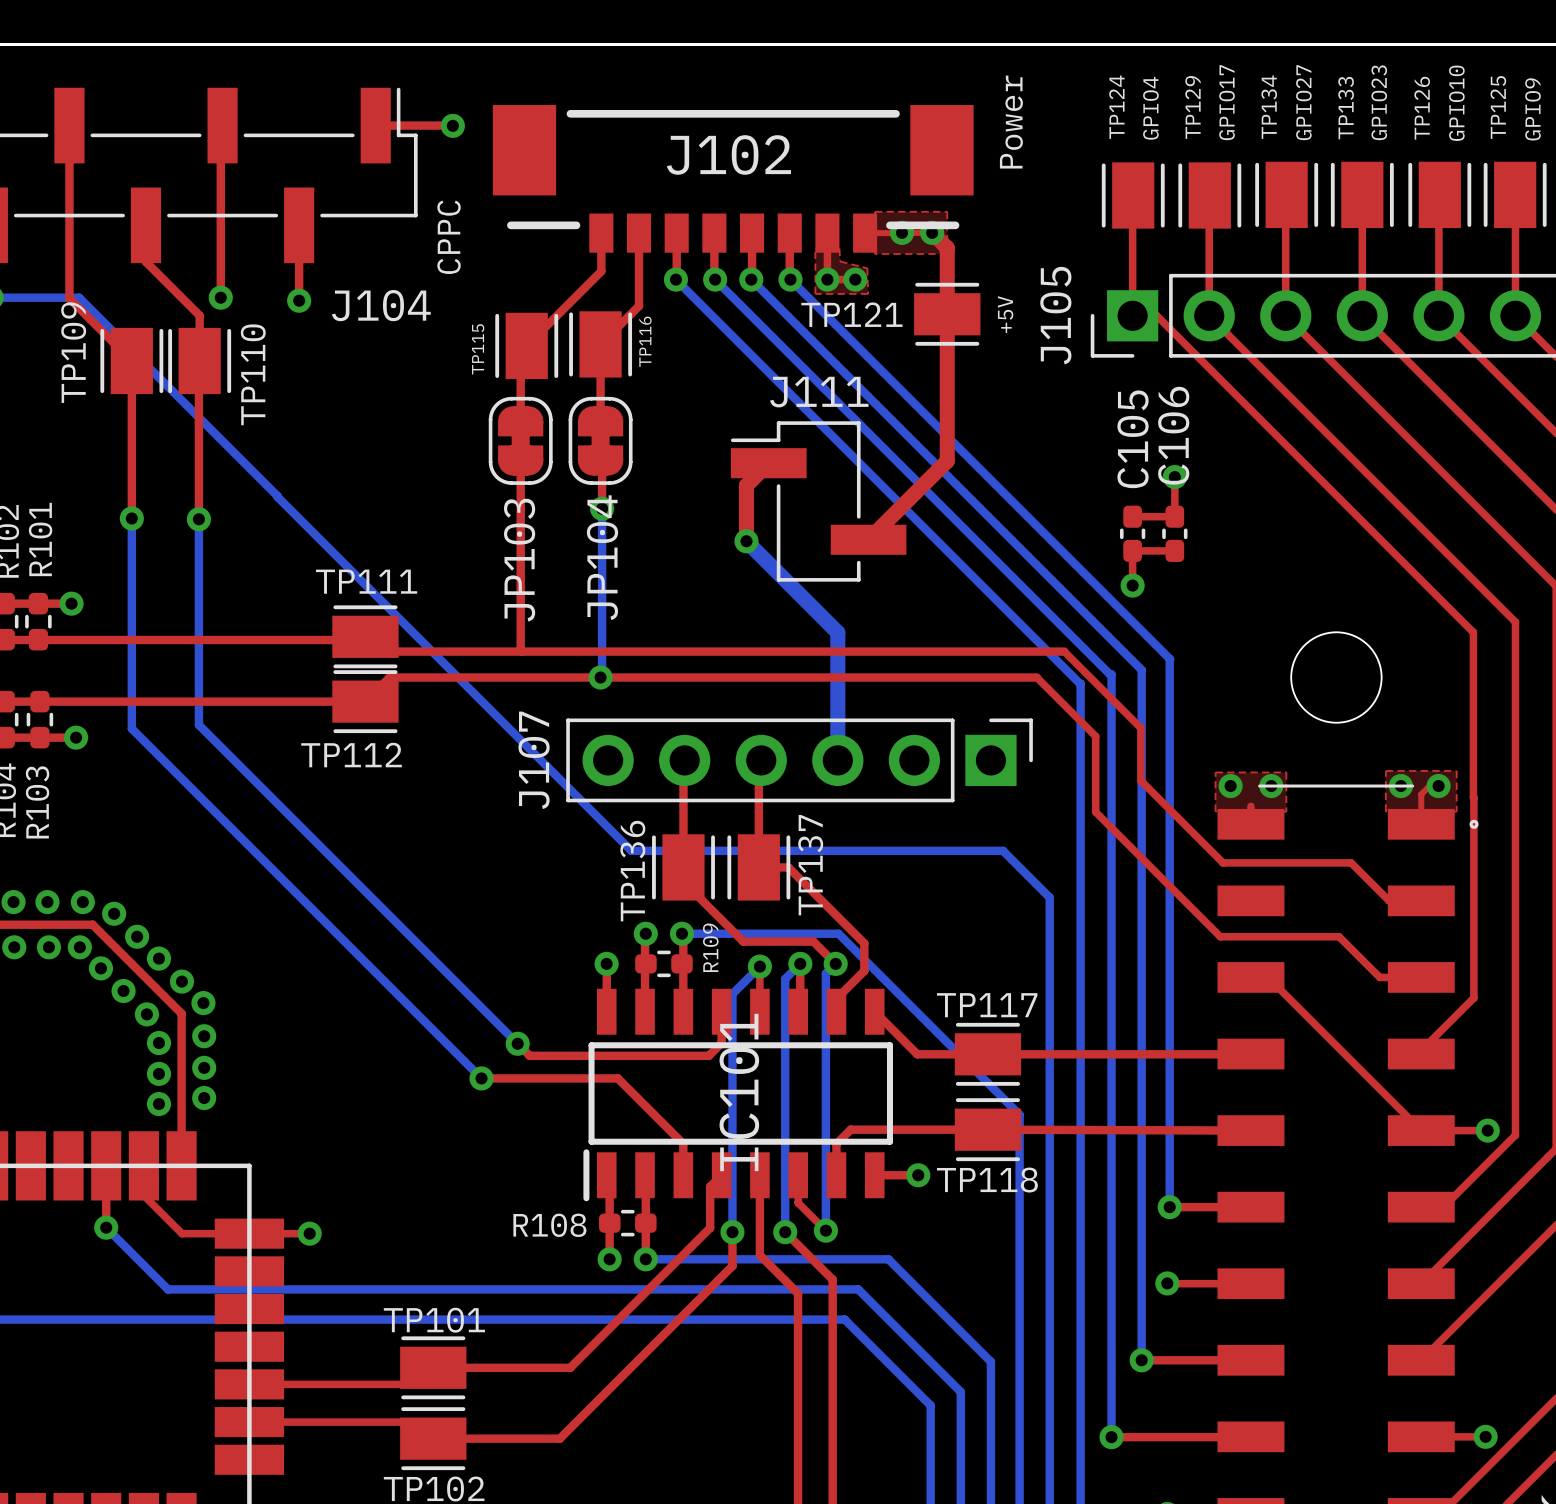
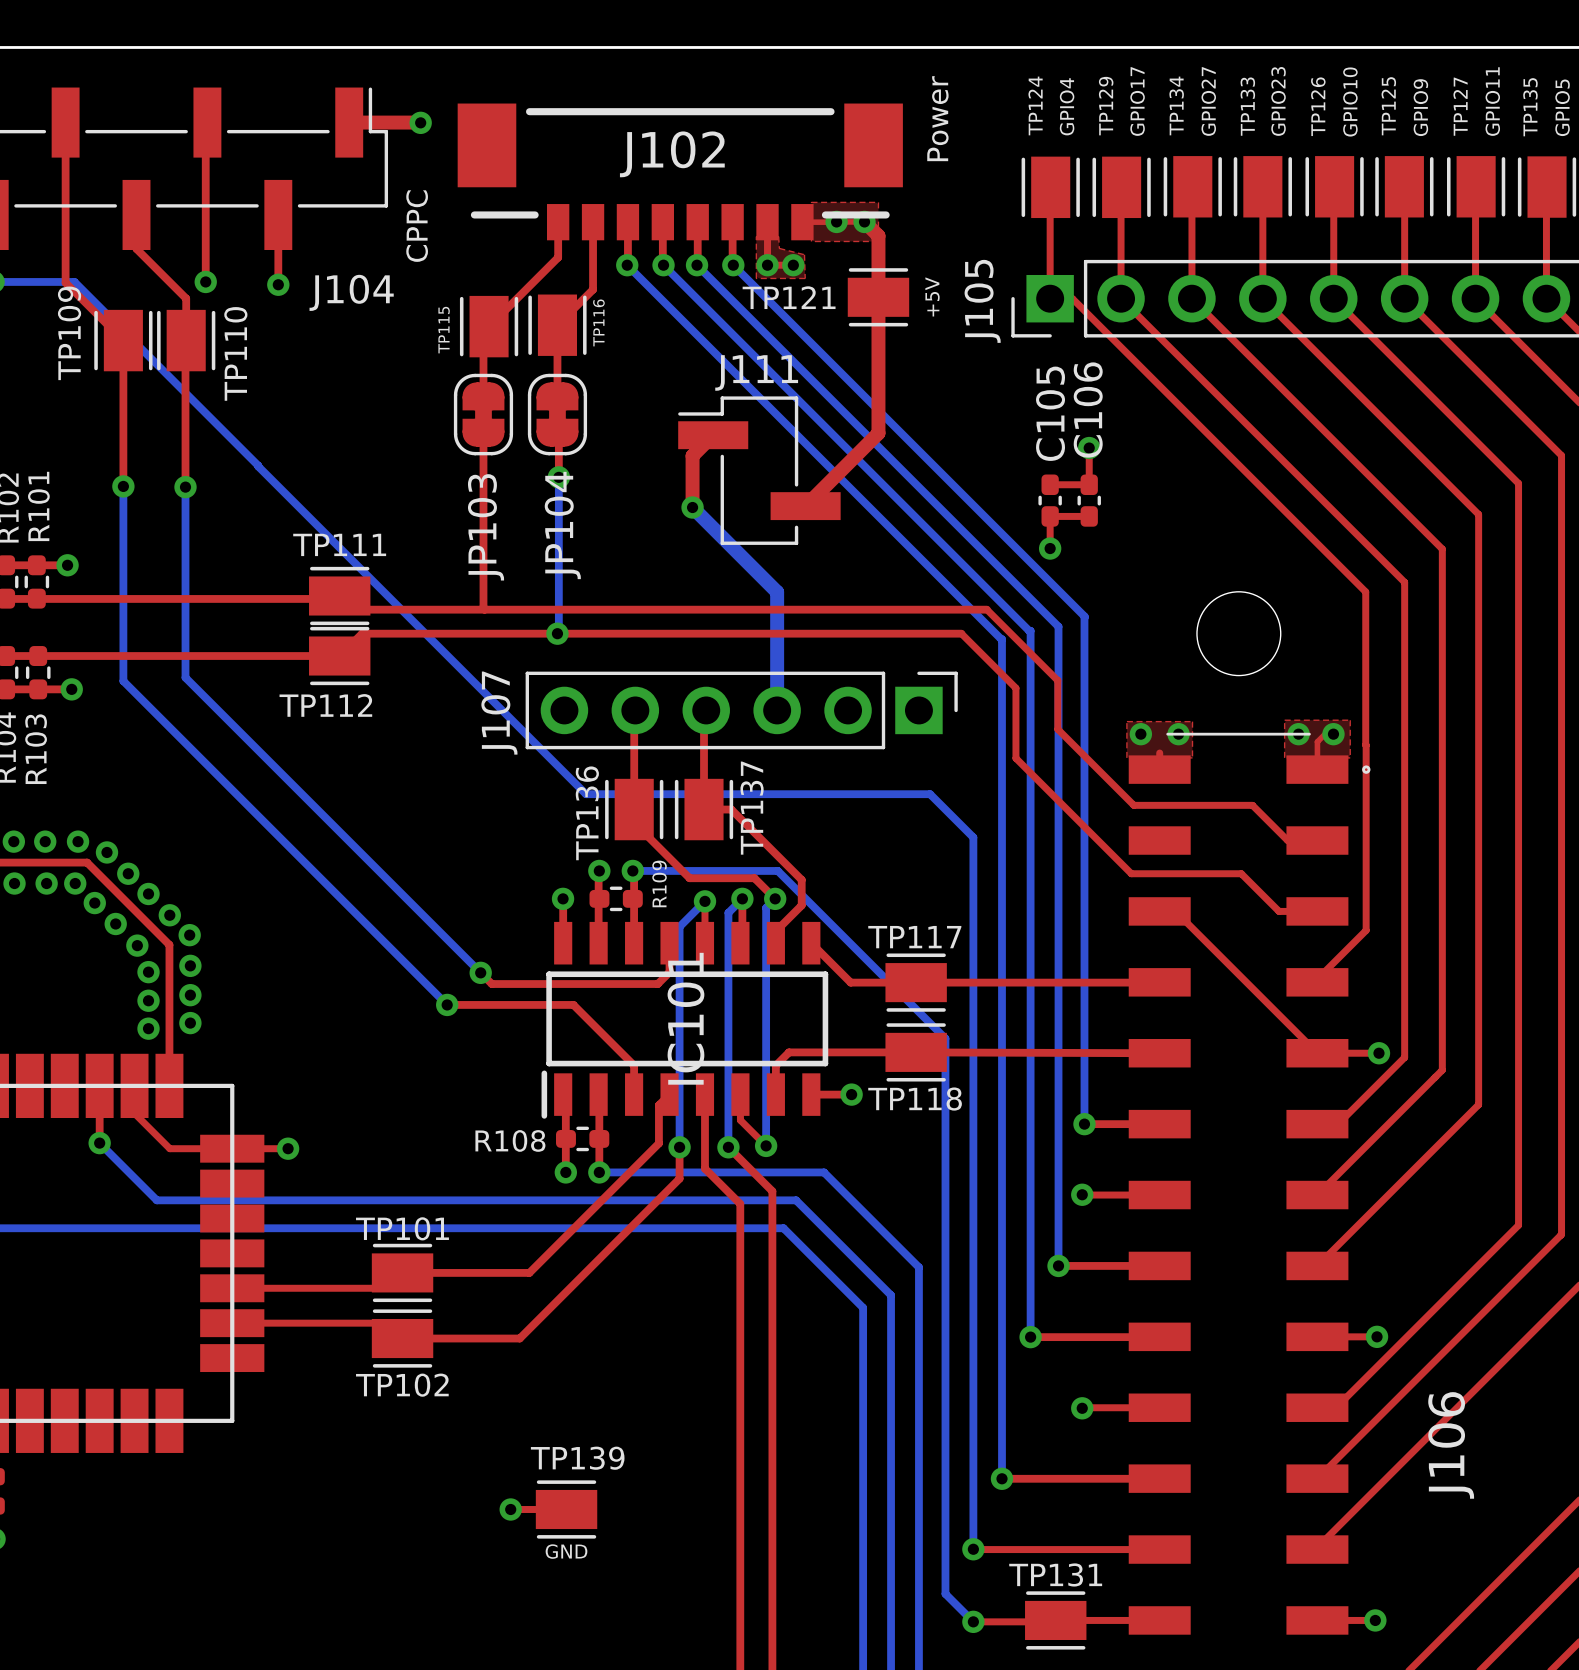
top track width: thin (375, 125) (452, 125) -> thick (349, 122) (420, 122)

